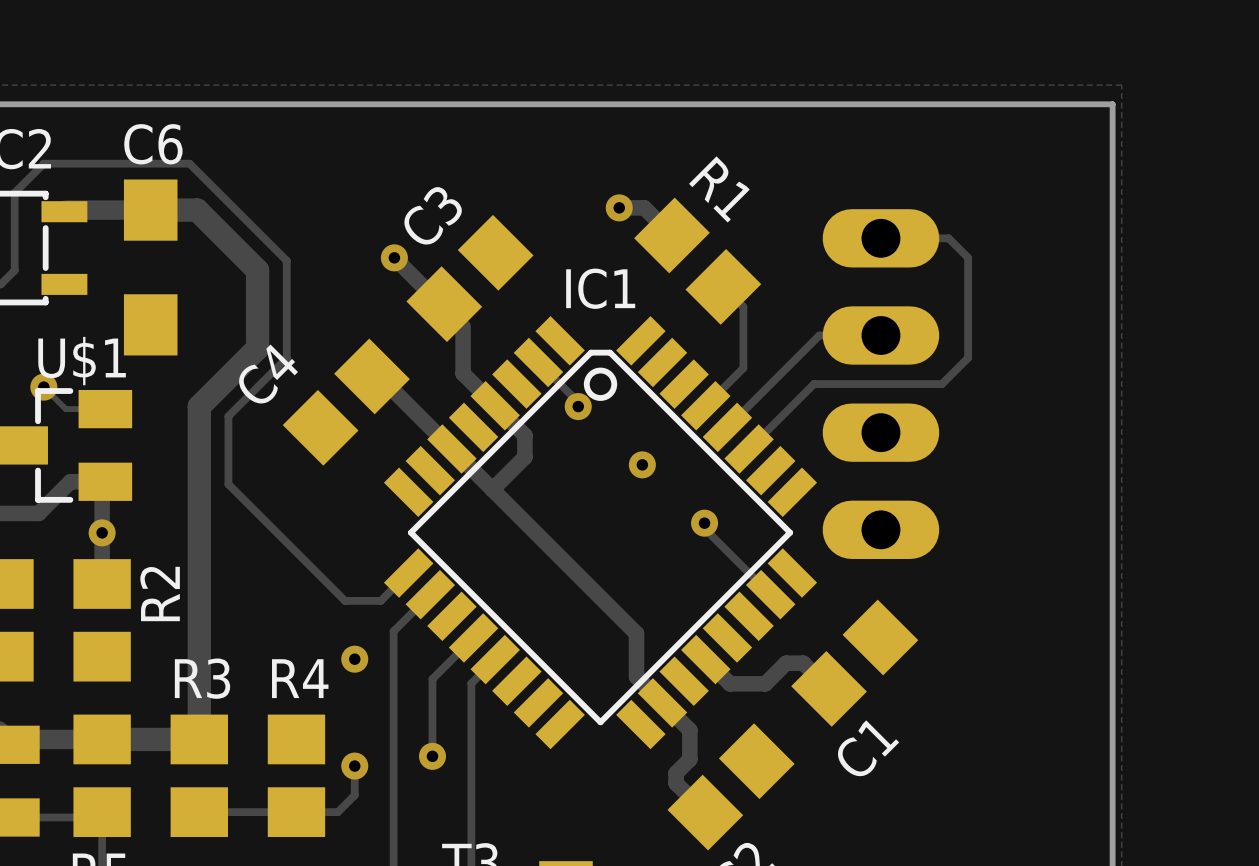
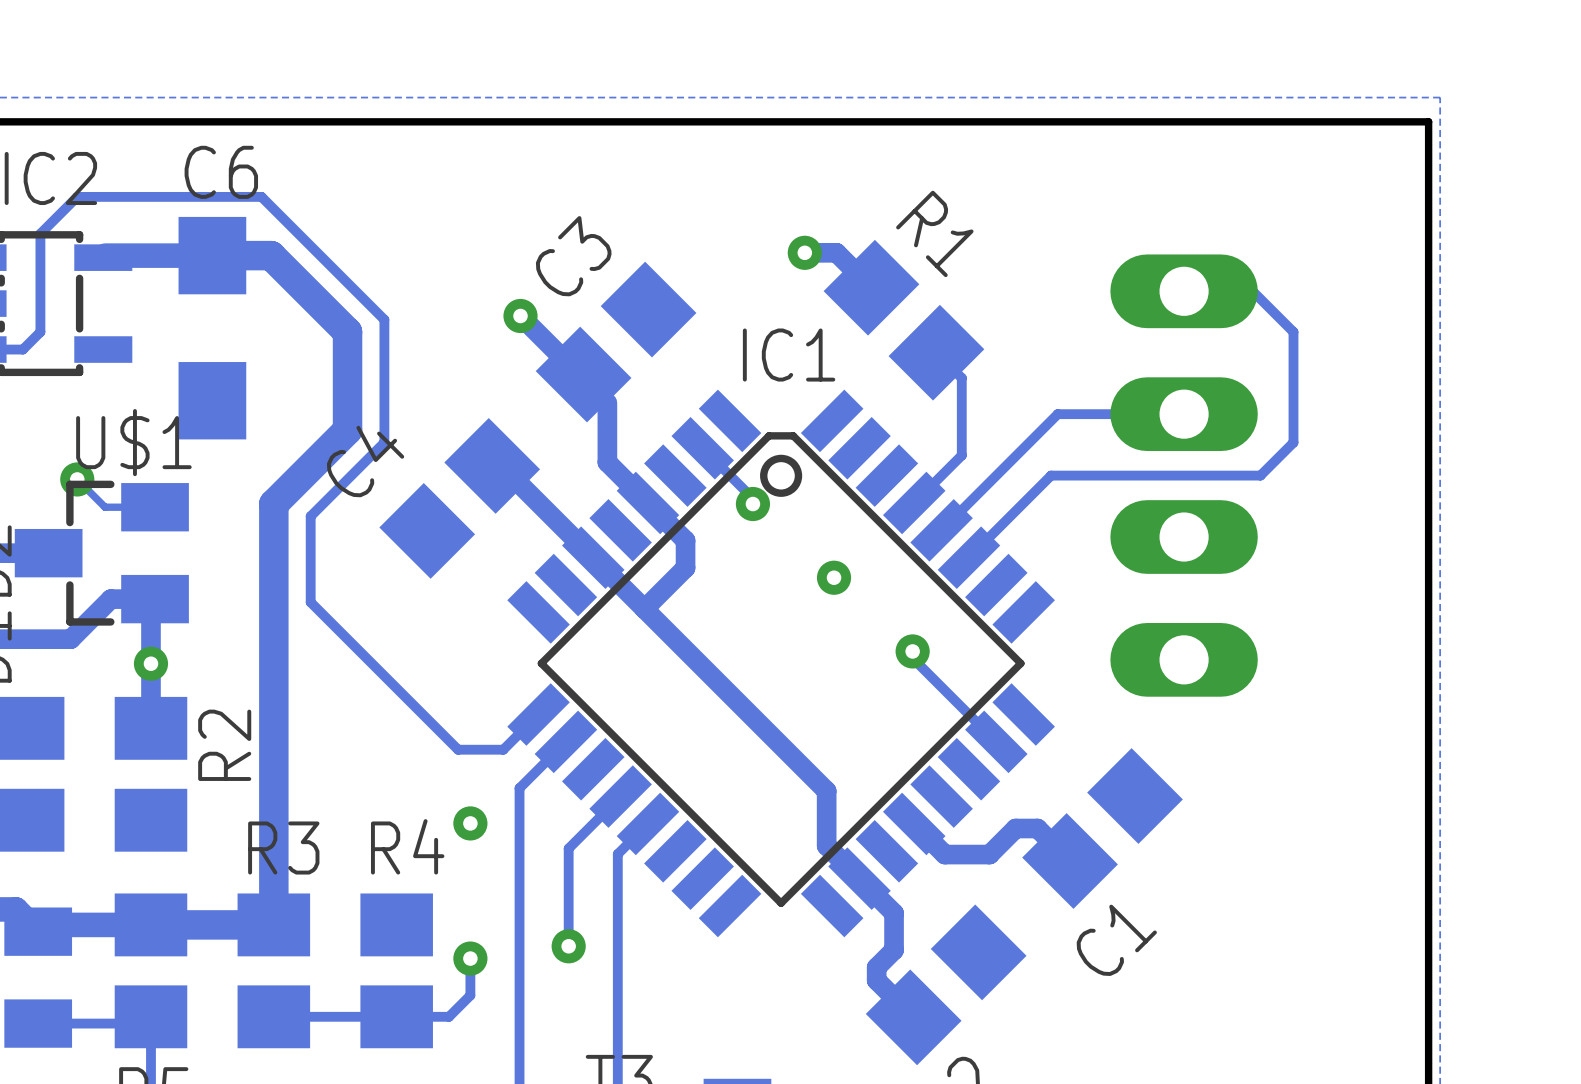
track: (948, 238) (968, 257) (968, 357) (942, 384) -> (1221, 291) (1252, 291) (1293, 332) (1293, 442) (1260, 475) (1212, 475)
part position: (880, 384) -> (1184, 475)

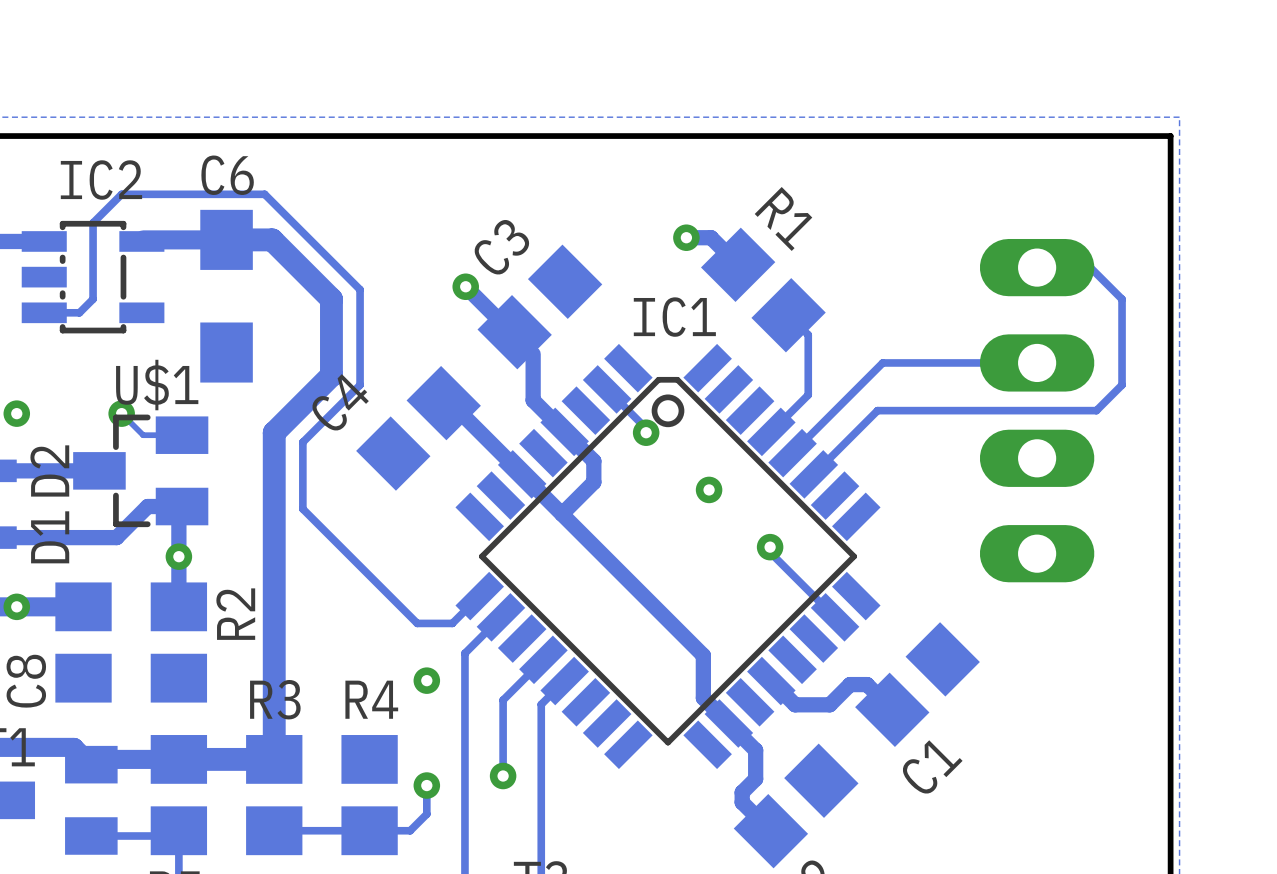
track: (1184, 291) (1252, 291) (1293, 332) (1293, 442) (1260, 475) -> (1037, 267) (1090, 267) (1122, 299) (1122, 385) (1096, 410) (1040, 410)
part position: (1184, 475) -> (1037, 410)

